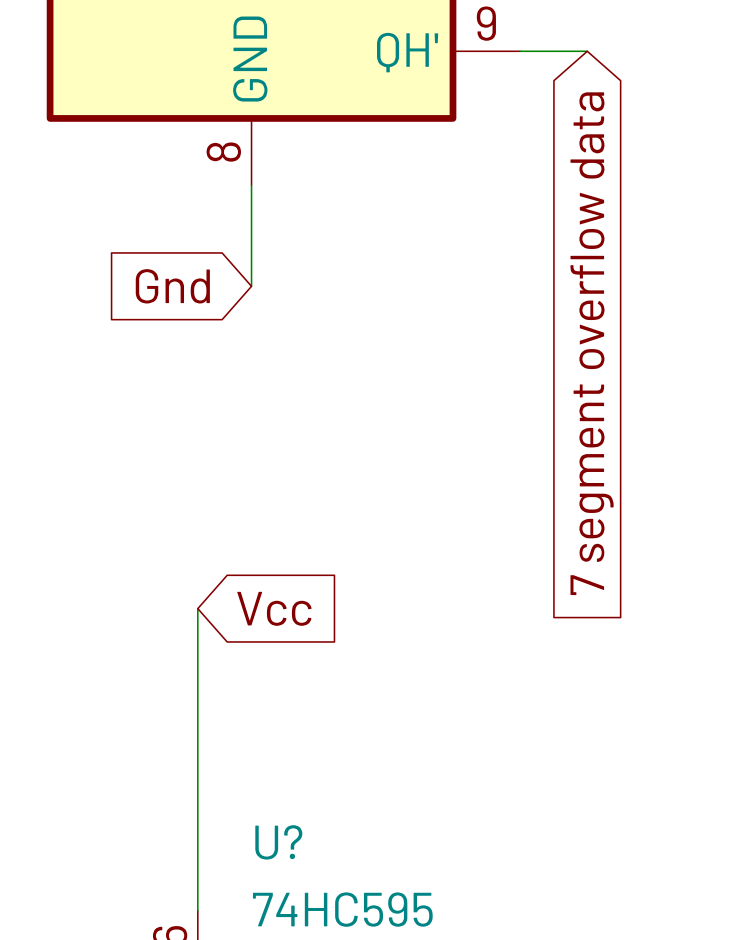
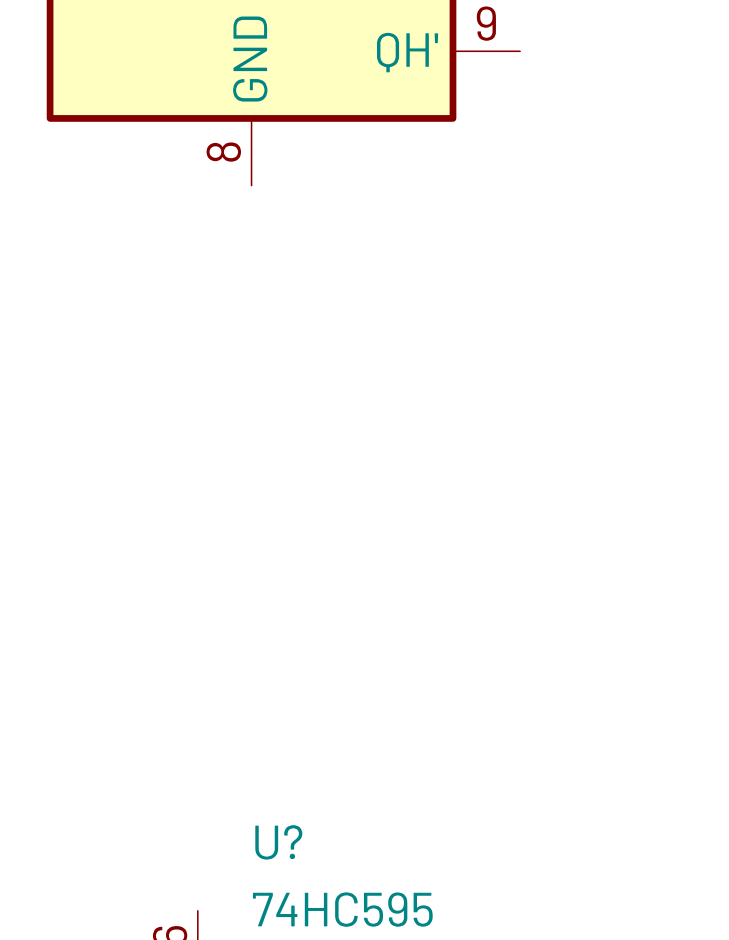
wire: (520, 51) (587, 51) -> none
wire: (251, 185) (251, 286) -> none
global label: Gnd (172, 286) -> none
global label: 7 segment overflow data (592, 343) -> none
wire: (197, 608) (197, 910) -> none
global label: Vcc (274, 608) -> none

